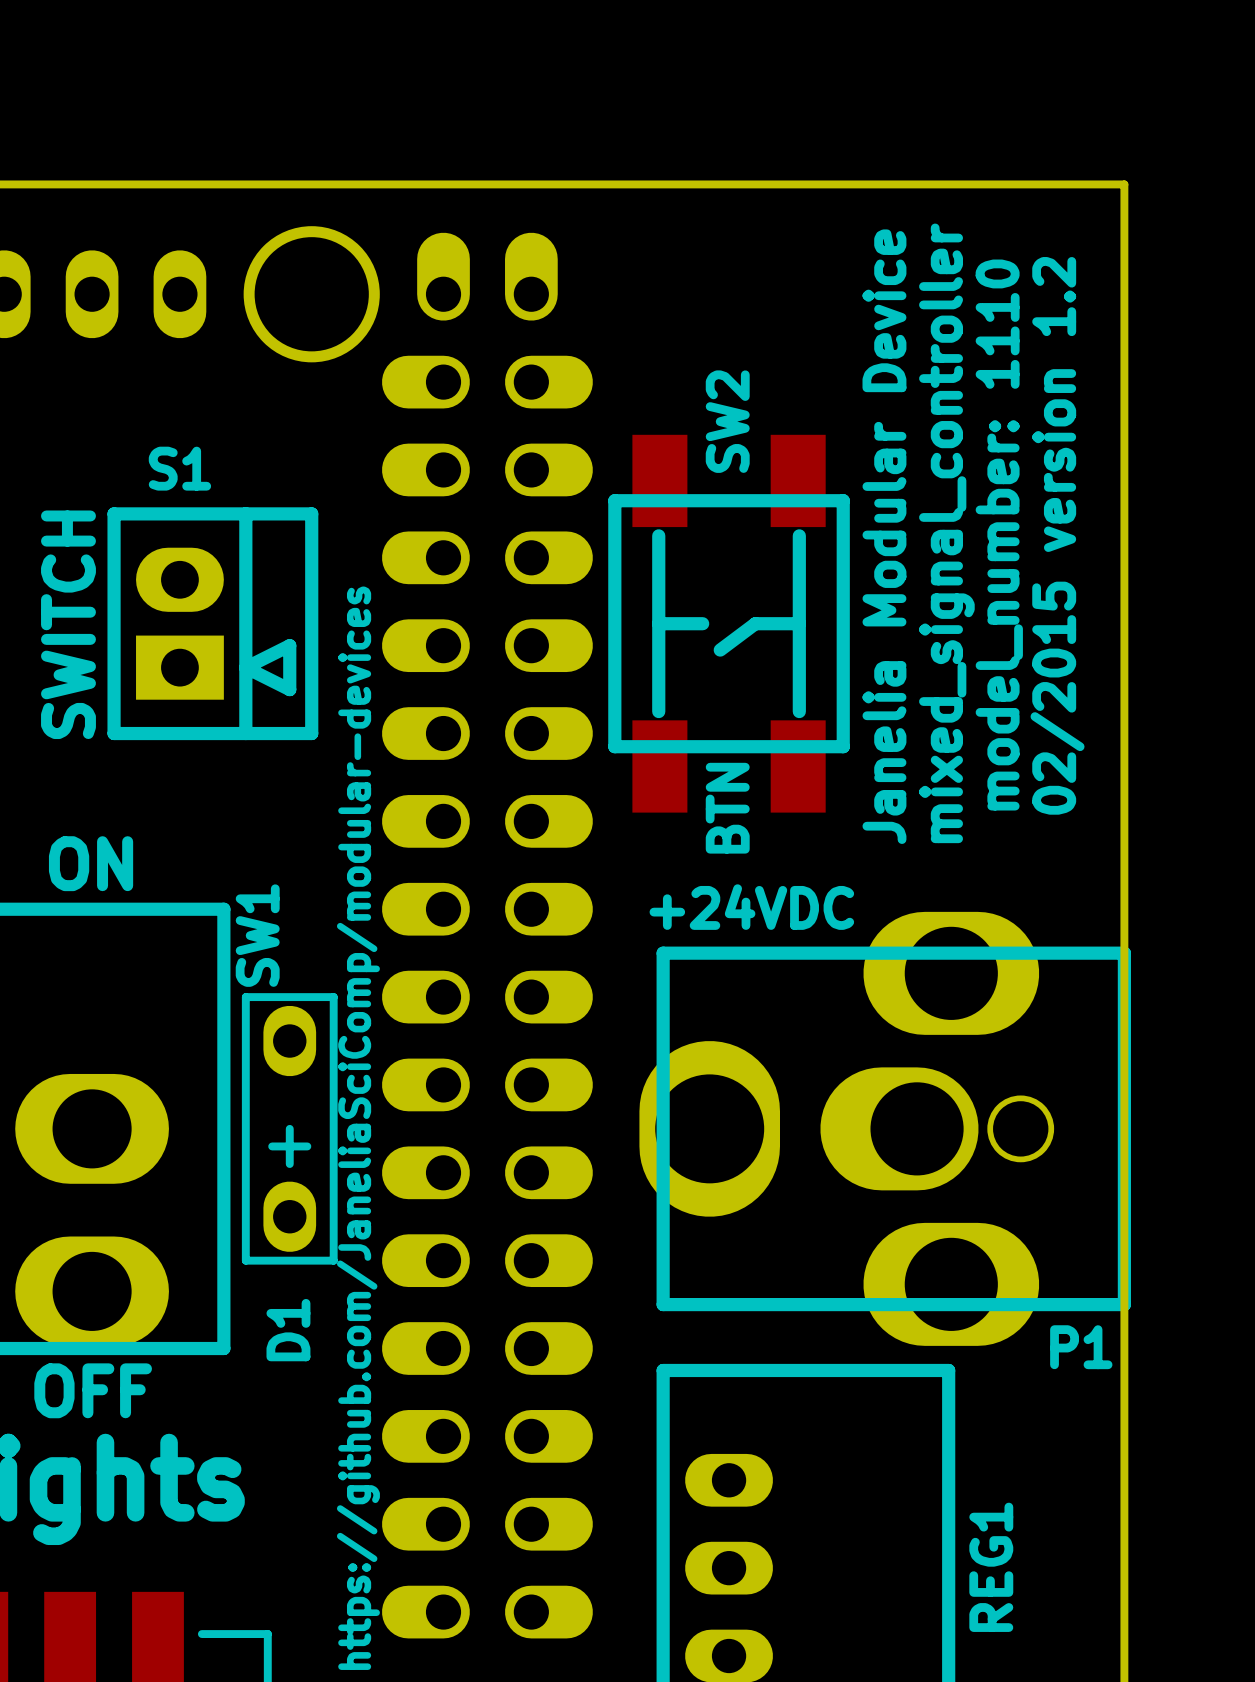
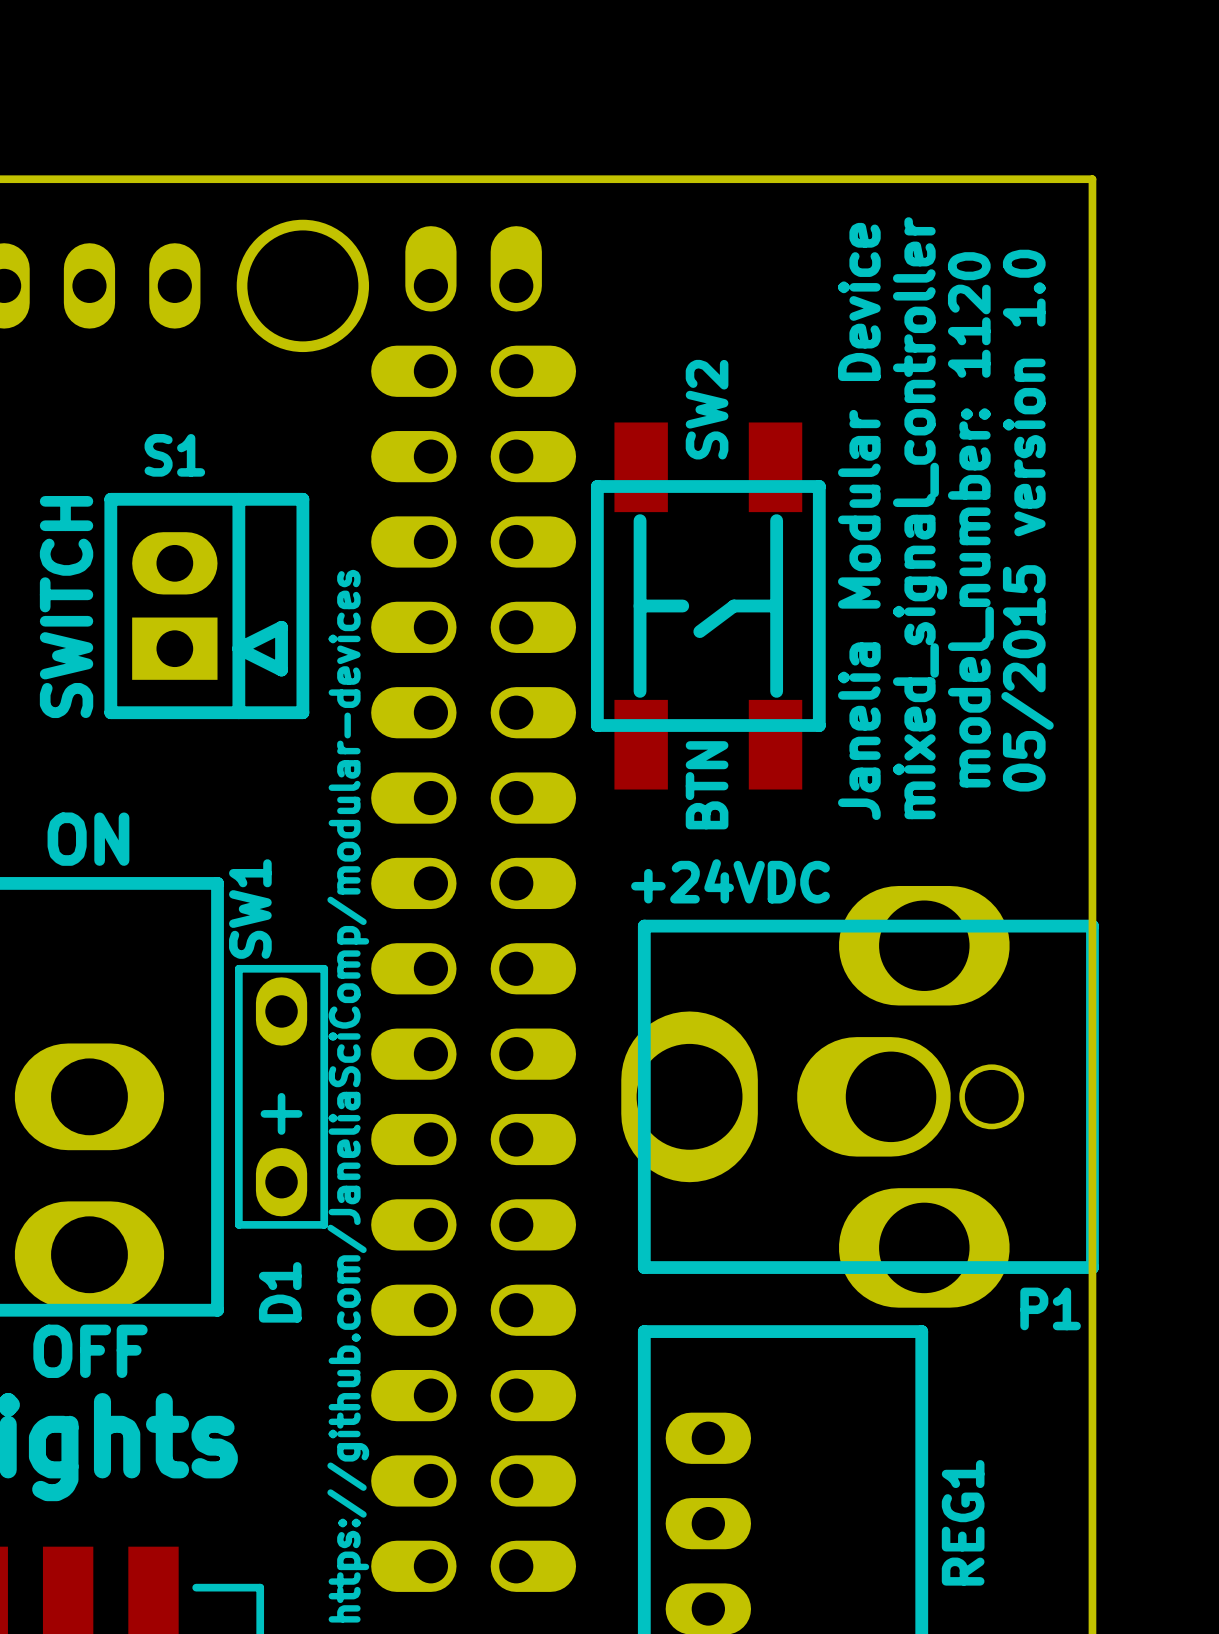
text: model_number: 1110 (999, 535) -> model_number: 1120 (970, 519)
text: 02/2015 version 1.2 (1057, 535) -> 05/2015 version 1.0 (1027, 520)

